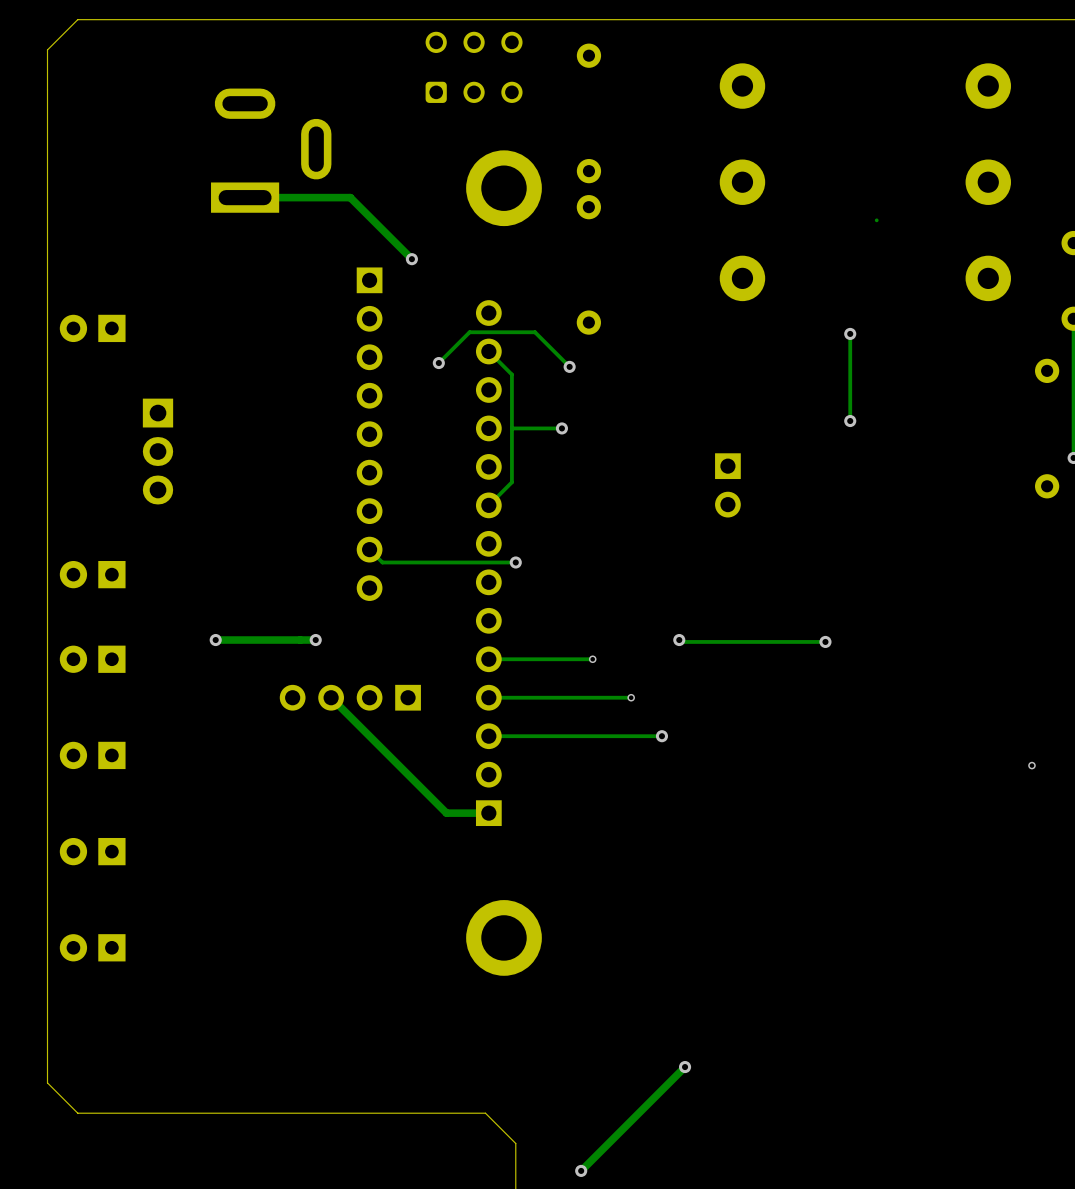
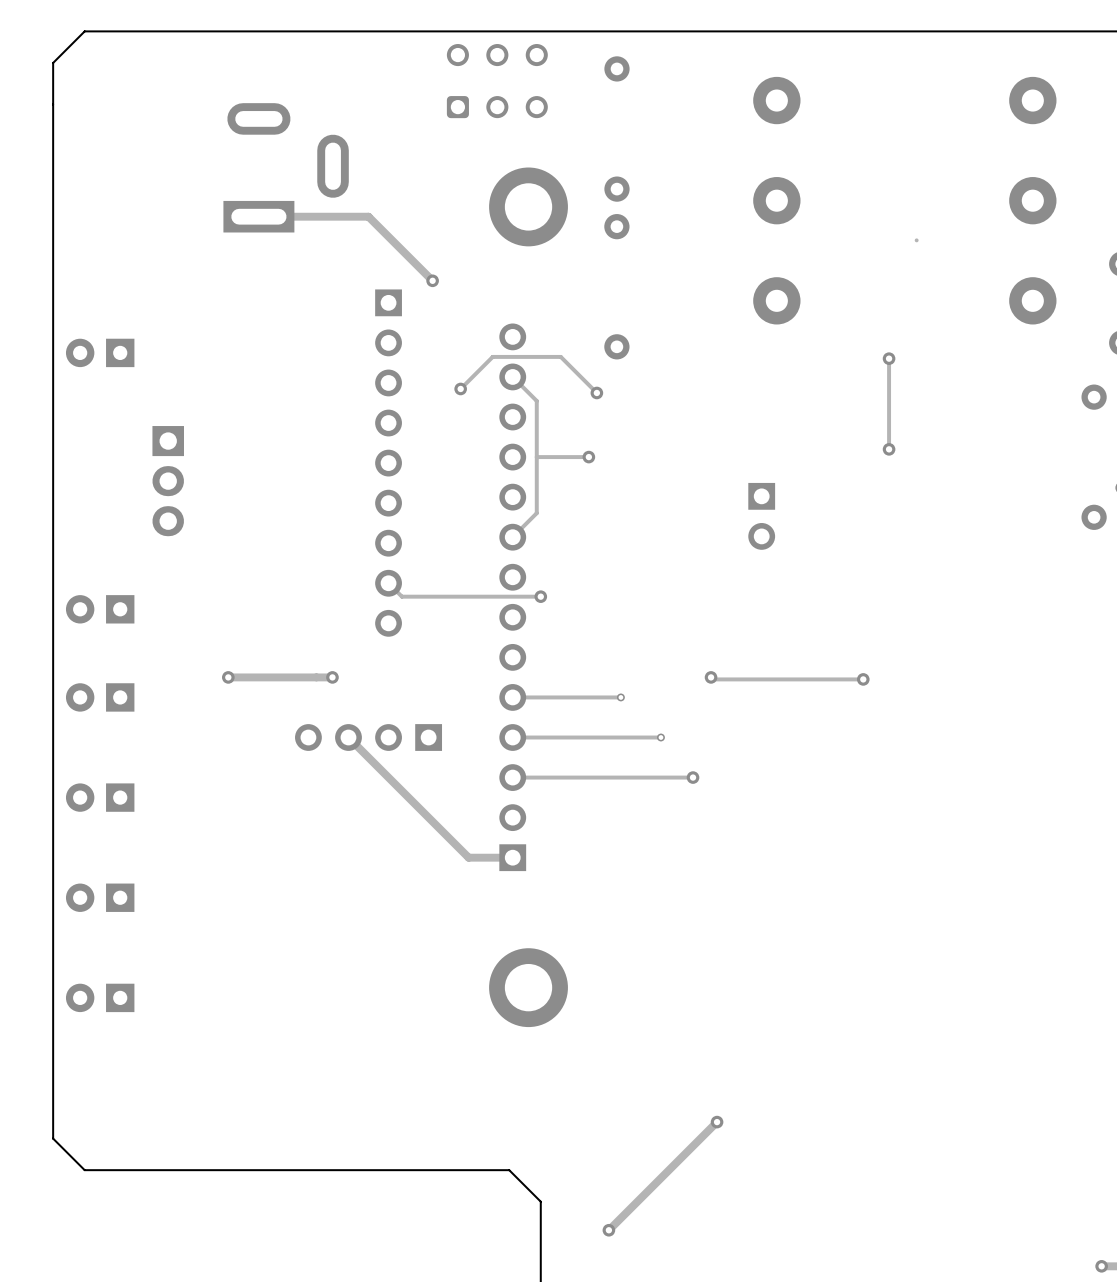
via: (1031, 765) -> none

